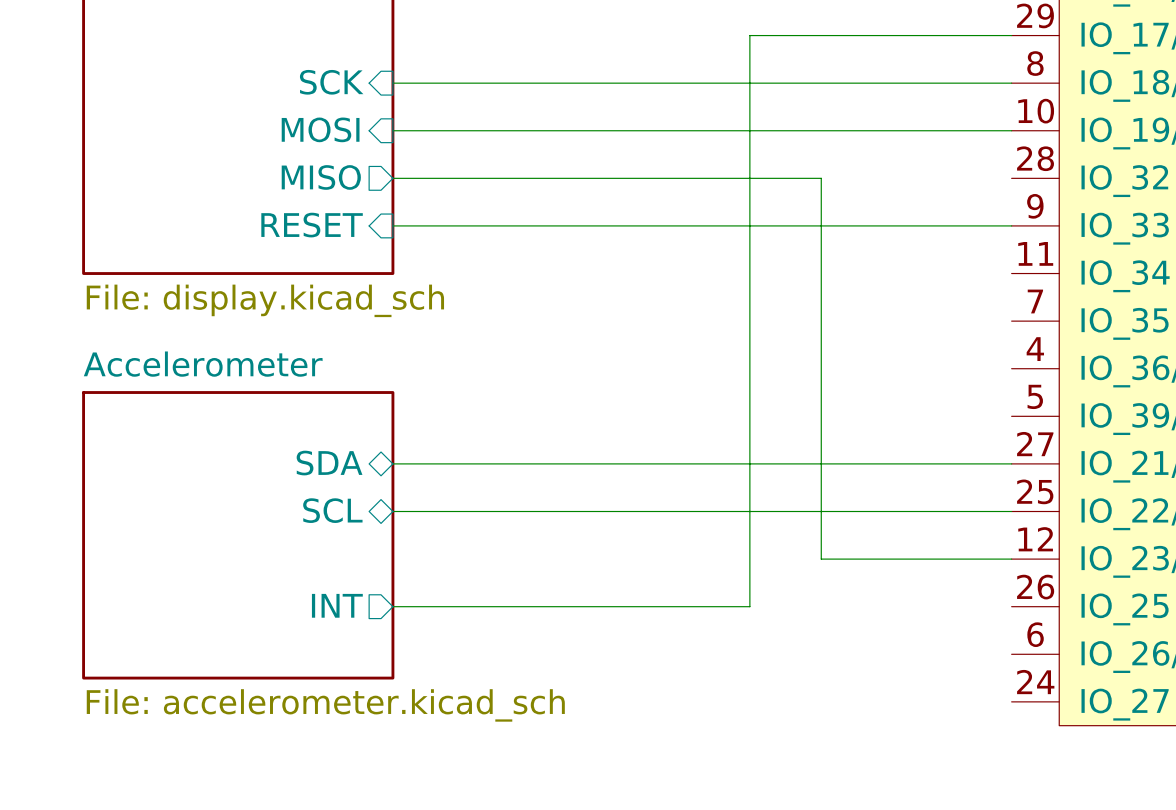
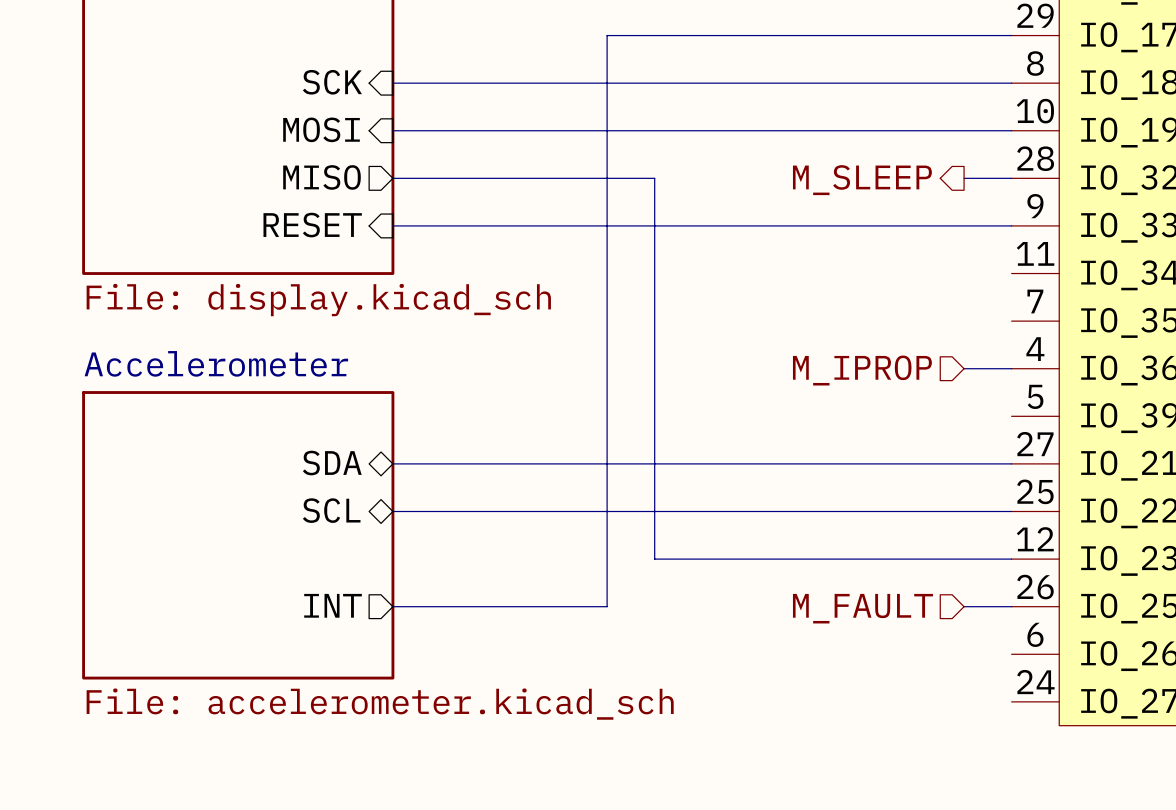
wire: (749, 35) (749, 606) (607, 606) -> (749, 35) (607, 35) (607, 606)
wire: (654, 178) (821, 178) (821, 559) -> (654, 178) (654, 559) (821, 559)
wire: none -> (964, 178) (1011, 178)
hierarchical label: none -> M_SLEEP (862, 180)
wire: none -> (964, 368) (1011, 368)
hierarchical label: none -> M_IPROP (862, 370)
wire: none -> (964, 606) (1011, 606)
hierarchical label: none -> M_FAULT (862, 608)

